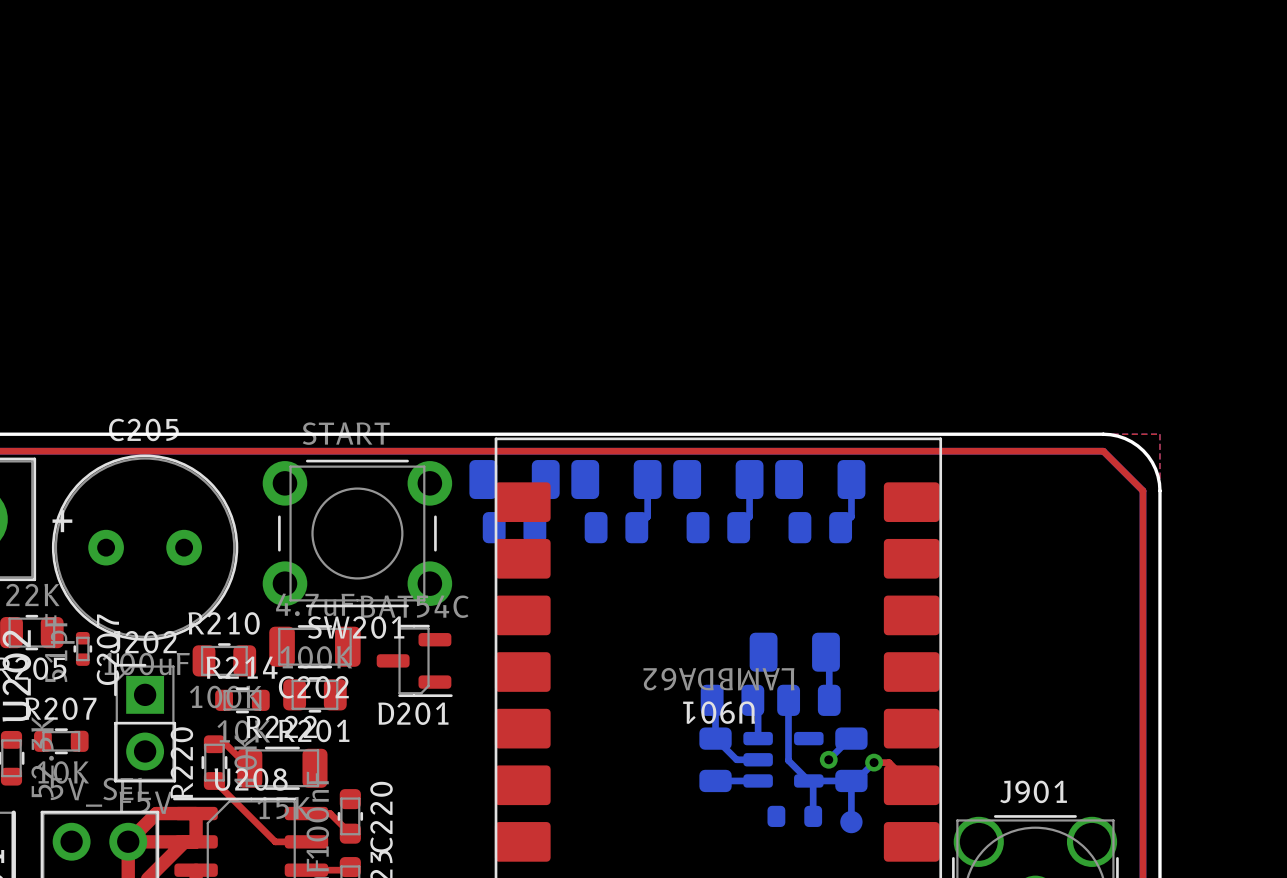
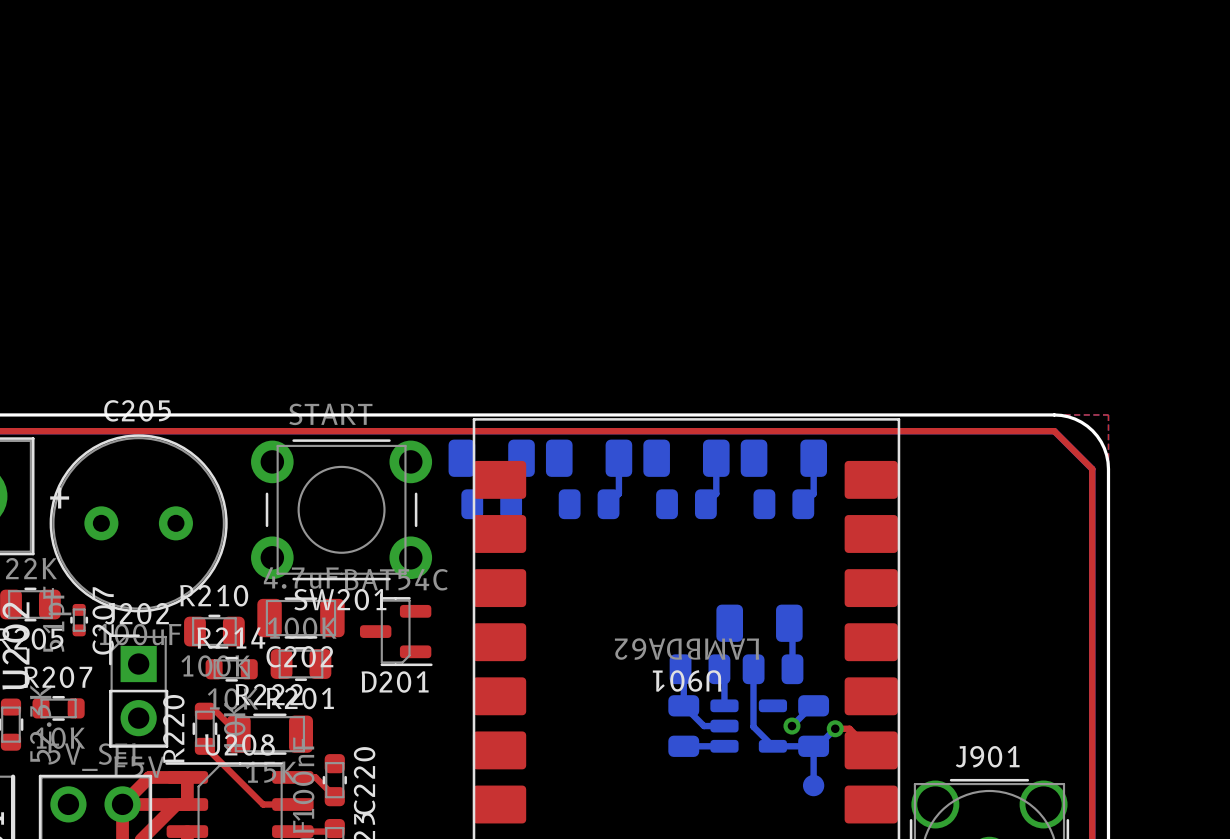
bottom track: (808, 780) (813, 785) (813, 816) -> none
part: (794, 816) -> none

